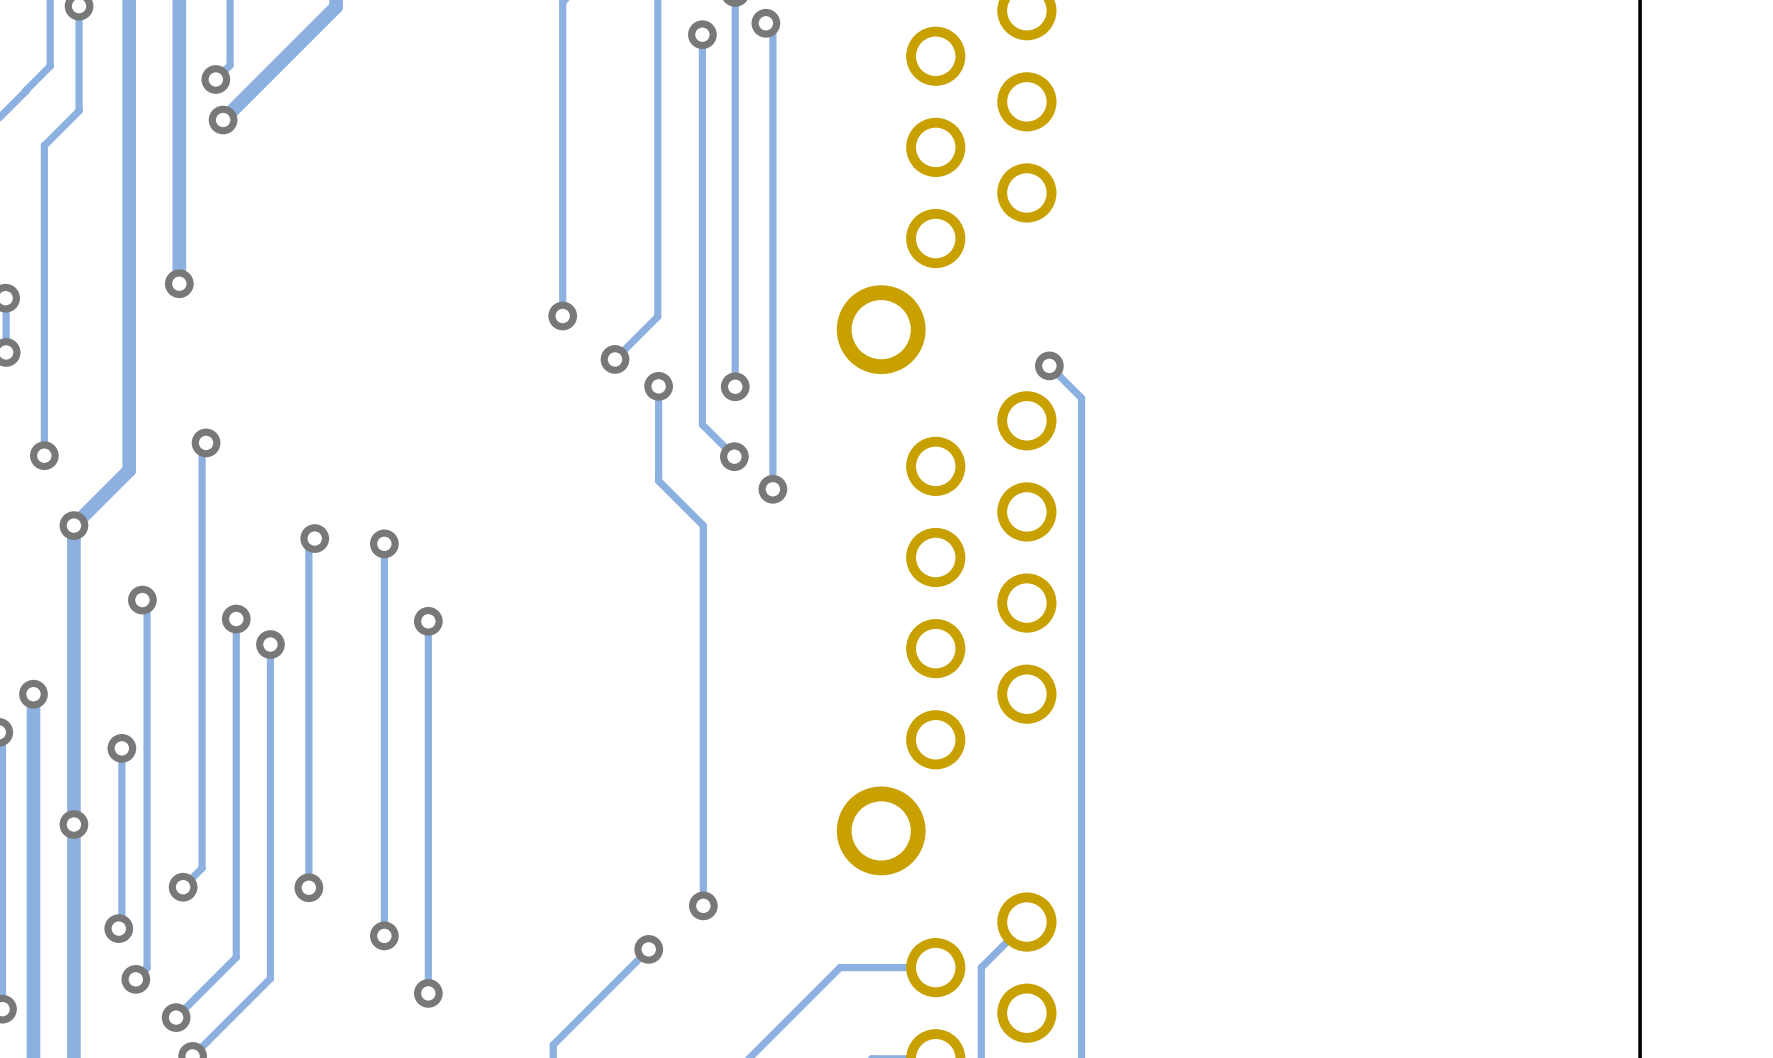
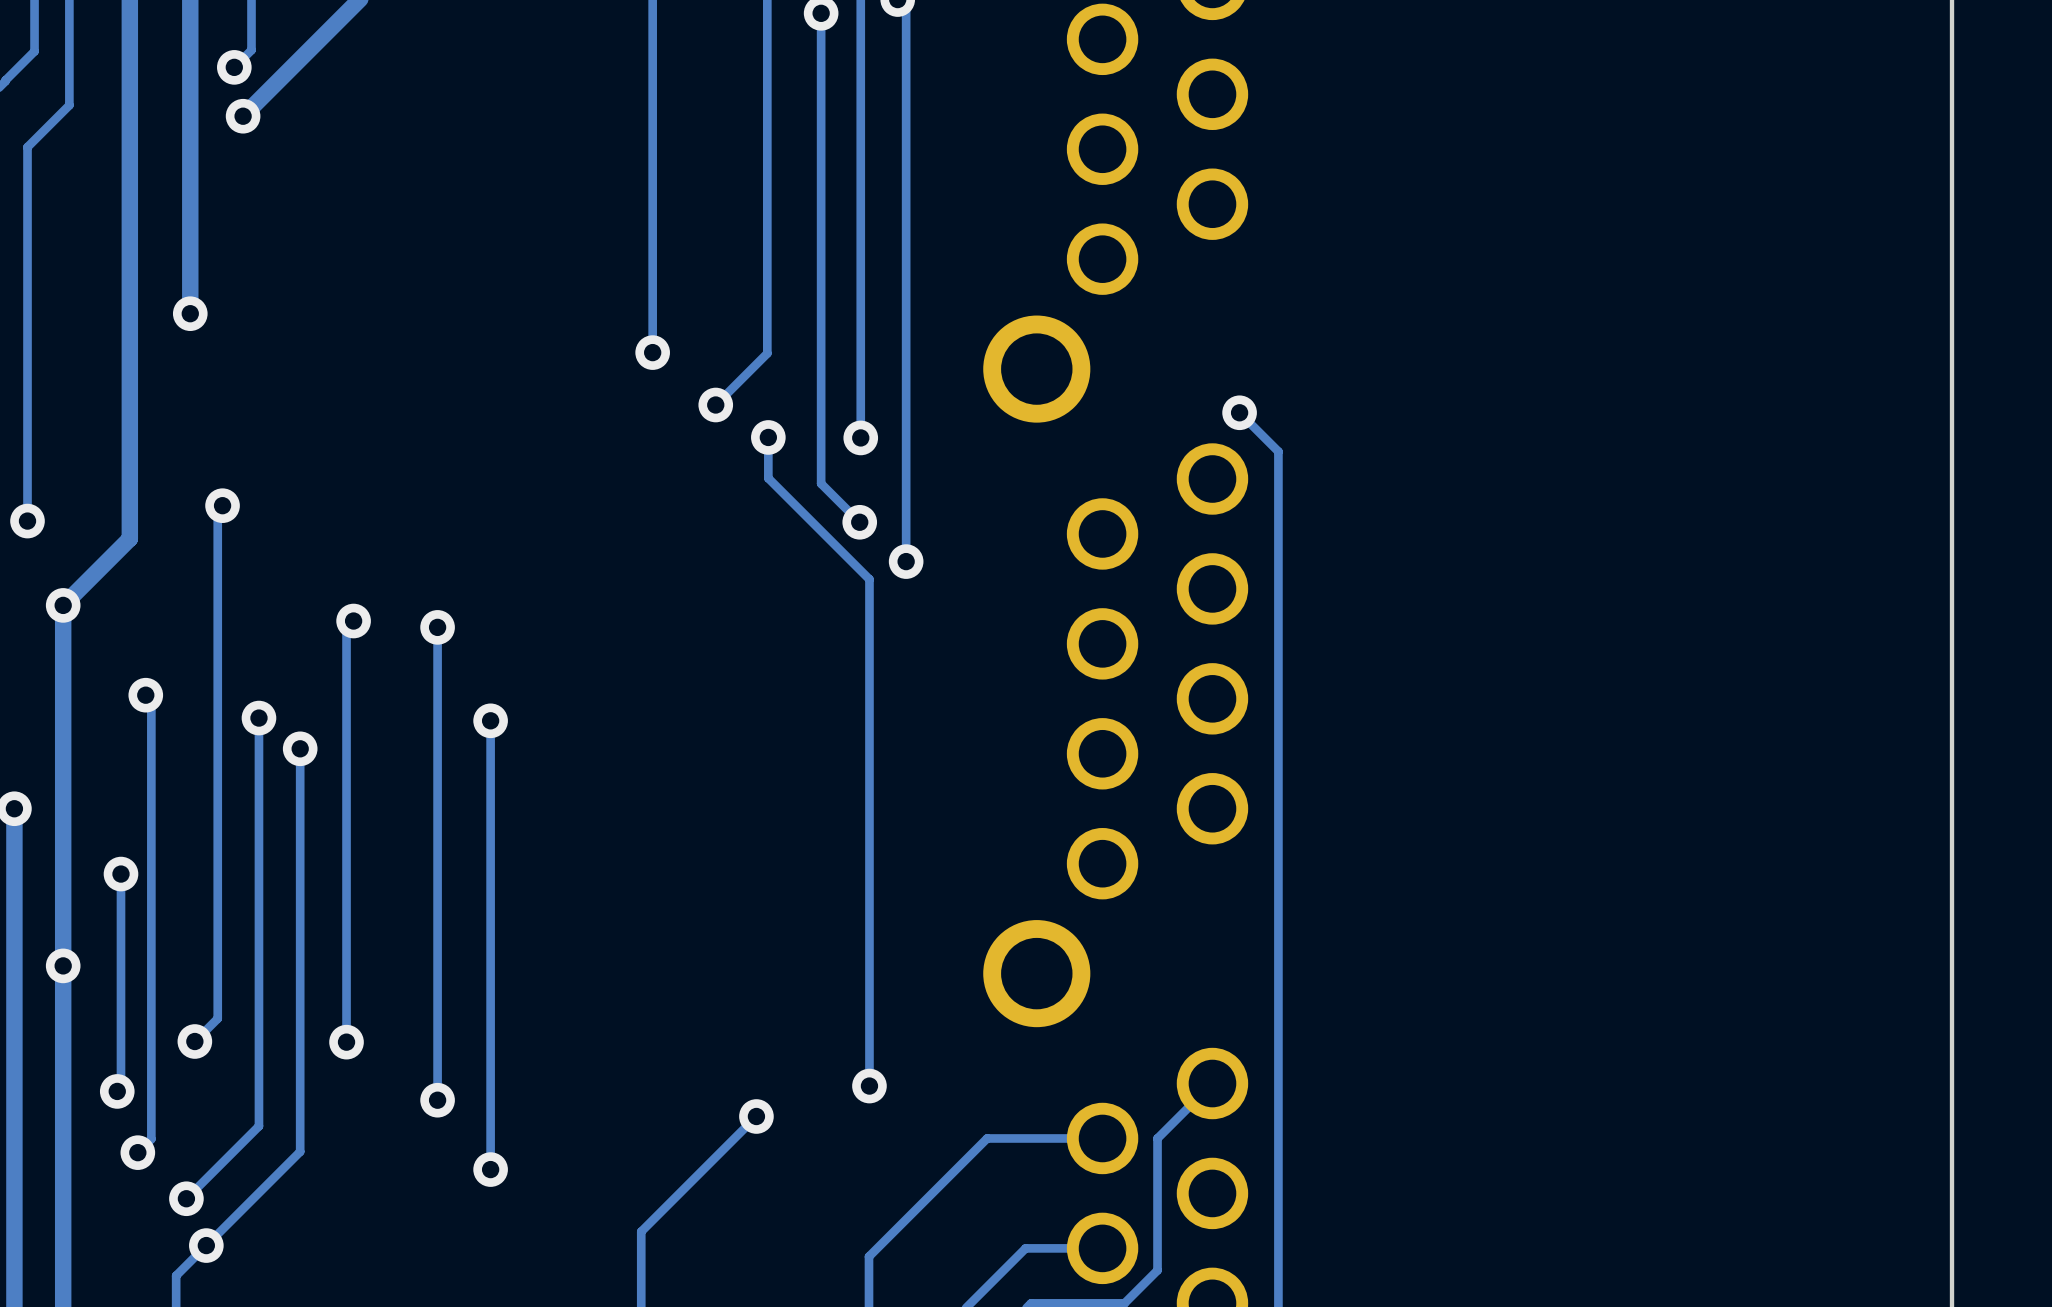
track: (658, 420) (658, 480) (703, 525) (703, 905) -> (768, 478) (869, 579) (869, 1086)
via position: (703, 905) -> (869, 1086)

